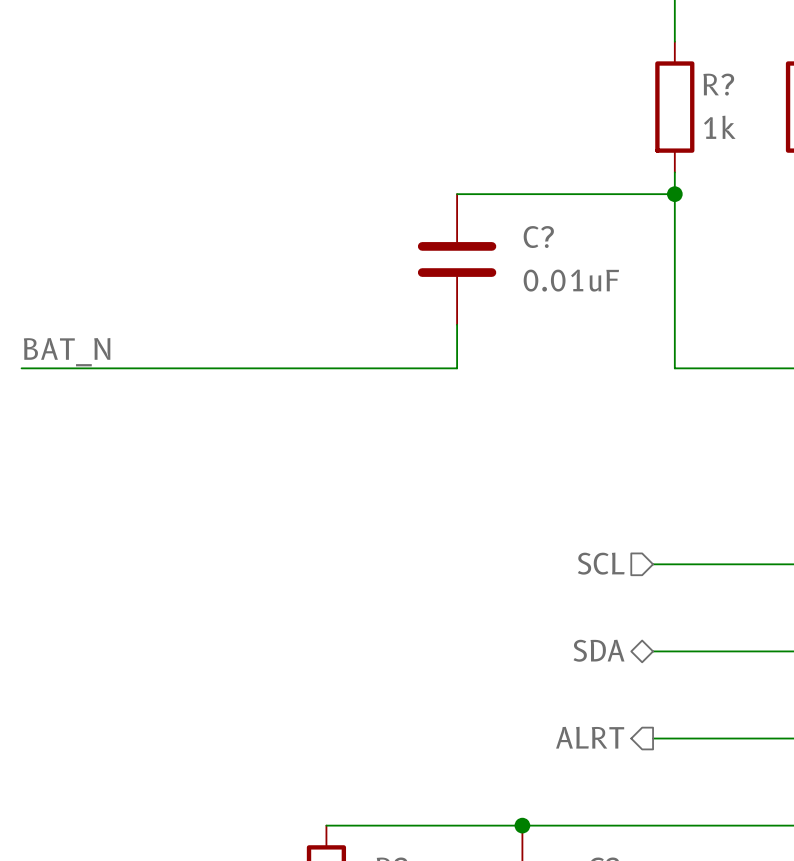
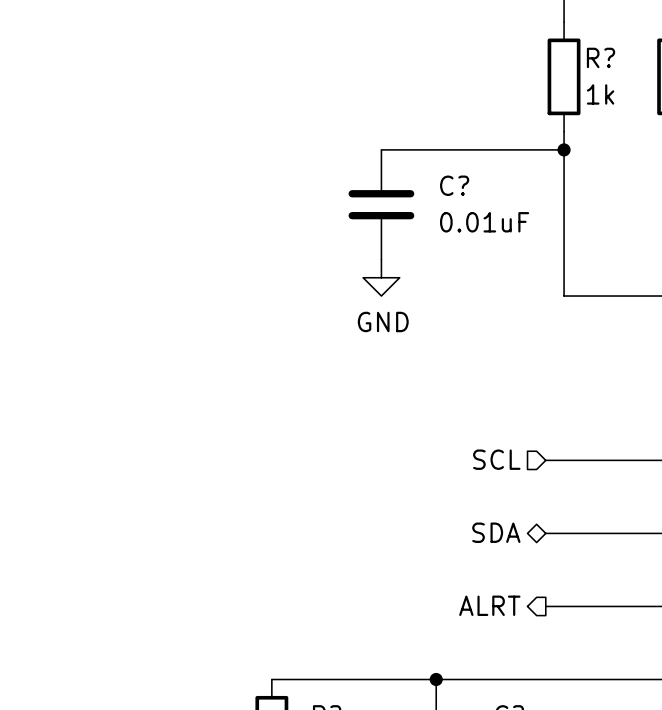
wire: (457, 324) (457, 368) (21, 368) -> none
power symbol: none -> GND (381, 277)
label: BAT_N (67, 352) -> none

